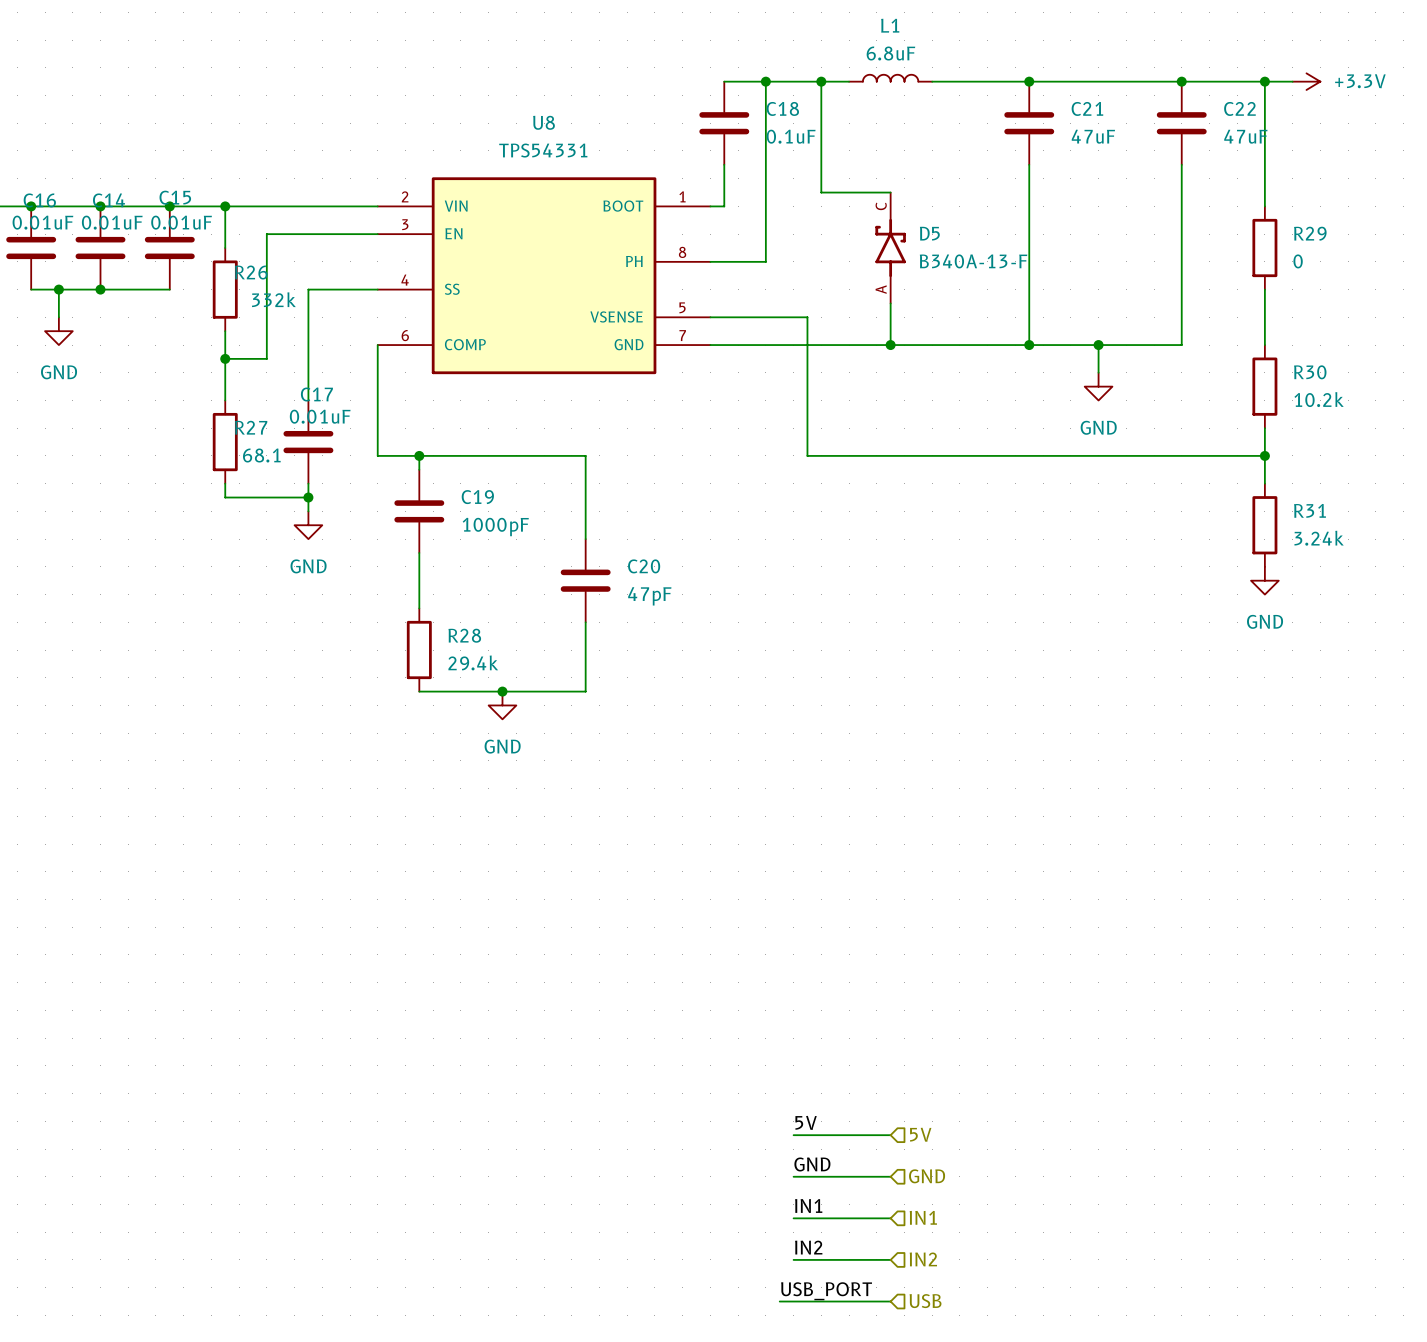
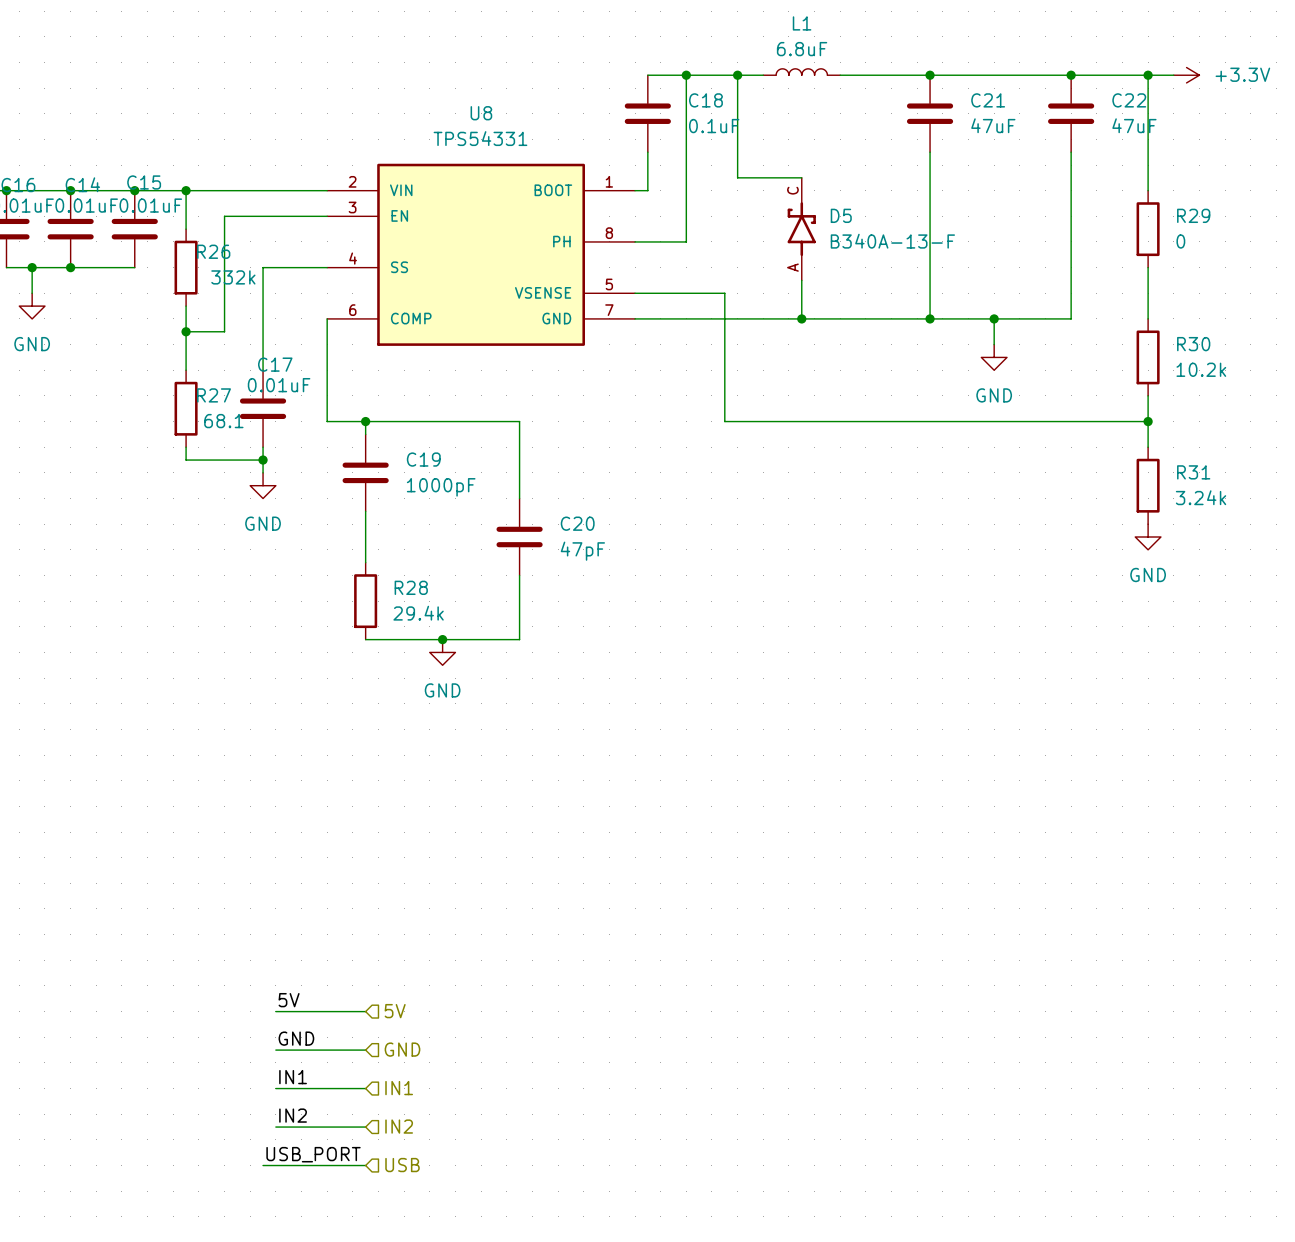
label: none -> 5V (289, 1000)
wire: none -> (275, 1011) (365, 1011)
hierarchical label: none -> 5V (395, 1011)
label: none -> GND (296, 1038)
label: 5V (806, 1122) -> none
hierarchical label: none -> GND (402, 1049)
hierarchical label: 5V (920, 1134) -> none
wire: none -> (275, 1050) (365, 1050)
wire: (793, 1135) (890, 1135) -> none
label: none -> IN1 (293, 1077)
label: GND (812, 1164) -> none
wire: none -> (275, 1088) (365, 1088)
hierarchical label: none -> IN1 (399, 1088)
wire: (793, 1176) (890, 1176) -> none
hierarchical label: GND (927, 1176) -> none
label: none -> IN2 (293, 1115)
label: IN1 (808, 1205) -> none
hierarchical label: none -> IN2 (399, 1126)
hierarchical label: IN1 (923, 1217) -> none
wire: none -> (275, 1127) (365, 1127)
wire: (793, 1218) (890, 1218) -> none
label: IN2 (808, 1247) -> none
label: none -> USB_PORT (313, 1154)
wire: none -> (263, 1165) (365, 1165)
hierarchical label: none -> USB (402, 1165)
wire: (793, 1259) (890, 1259) -> none
hierarchical label: IN2 (923, 1259) -> none
label: USB_PORT (826, 1291) -> none
wire: (779, 1301) (890, 1301) -> none
hierarchical label: USB (925, 1301) -> none

